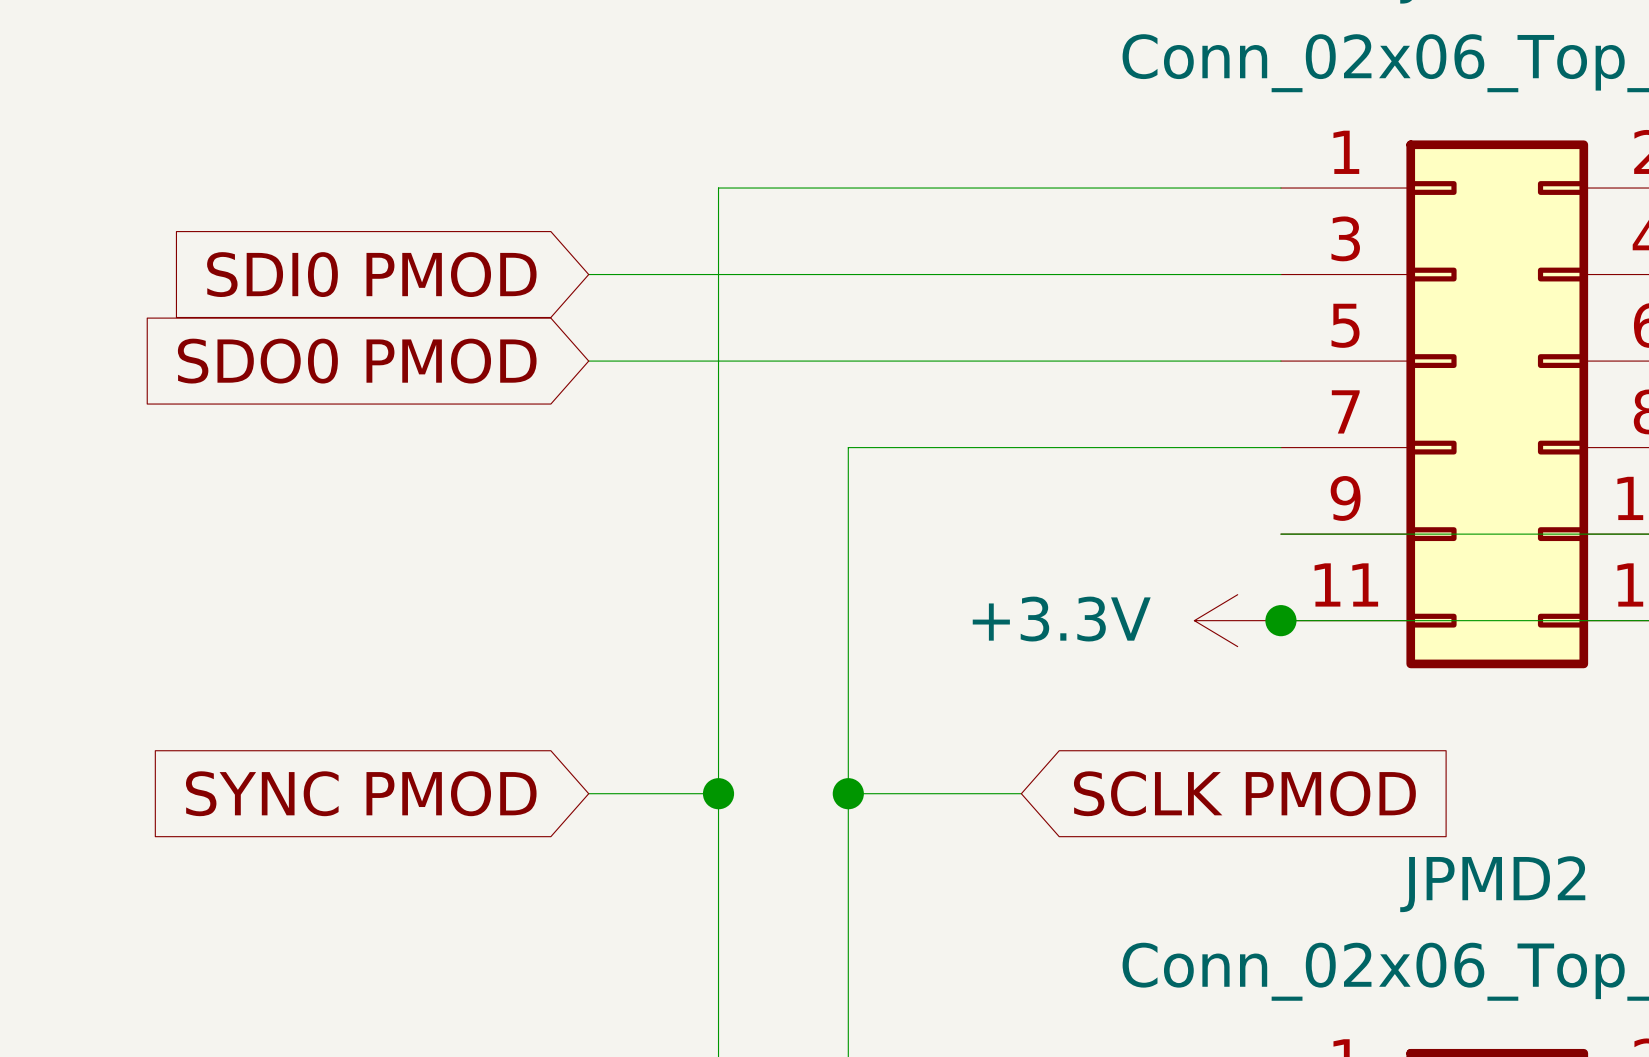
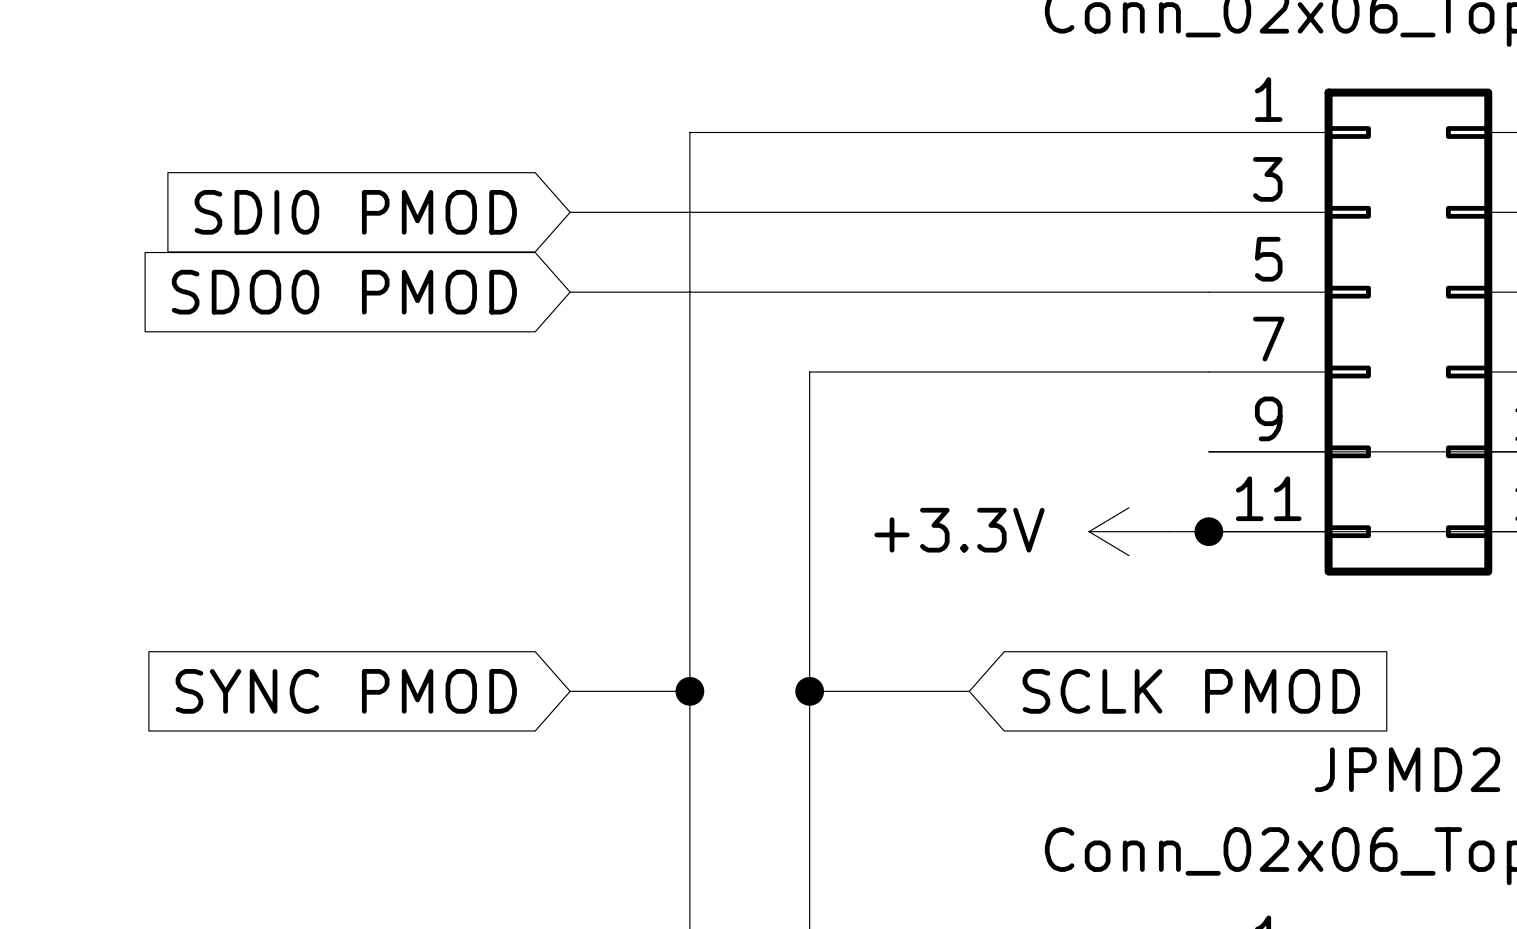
power symbol position: +3.3V (1237, 620) -> +3.3V (1129, 531)

